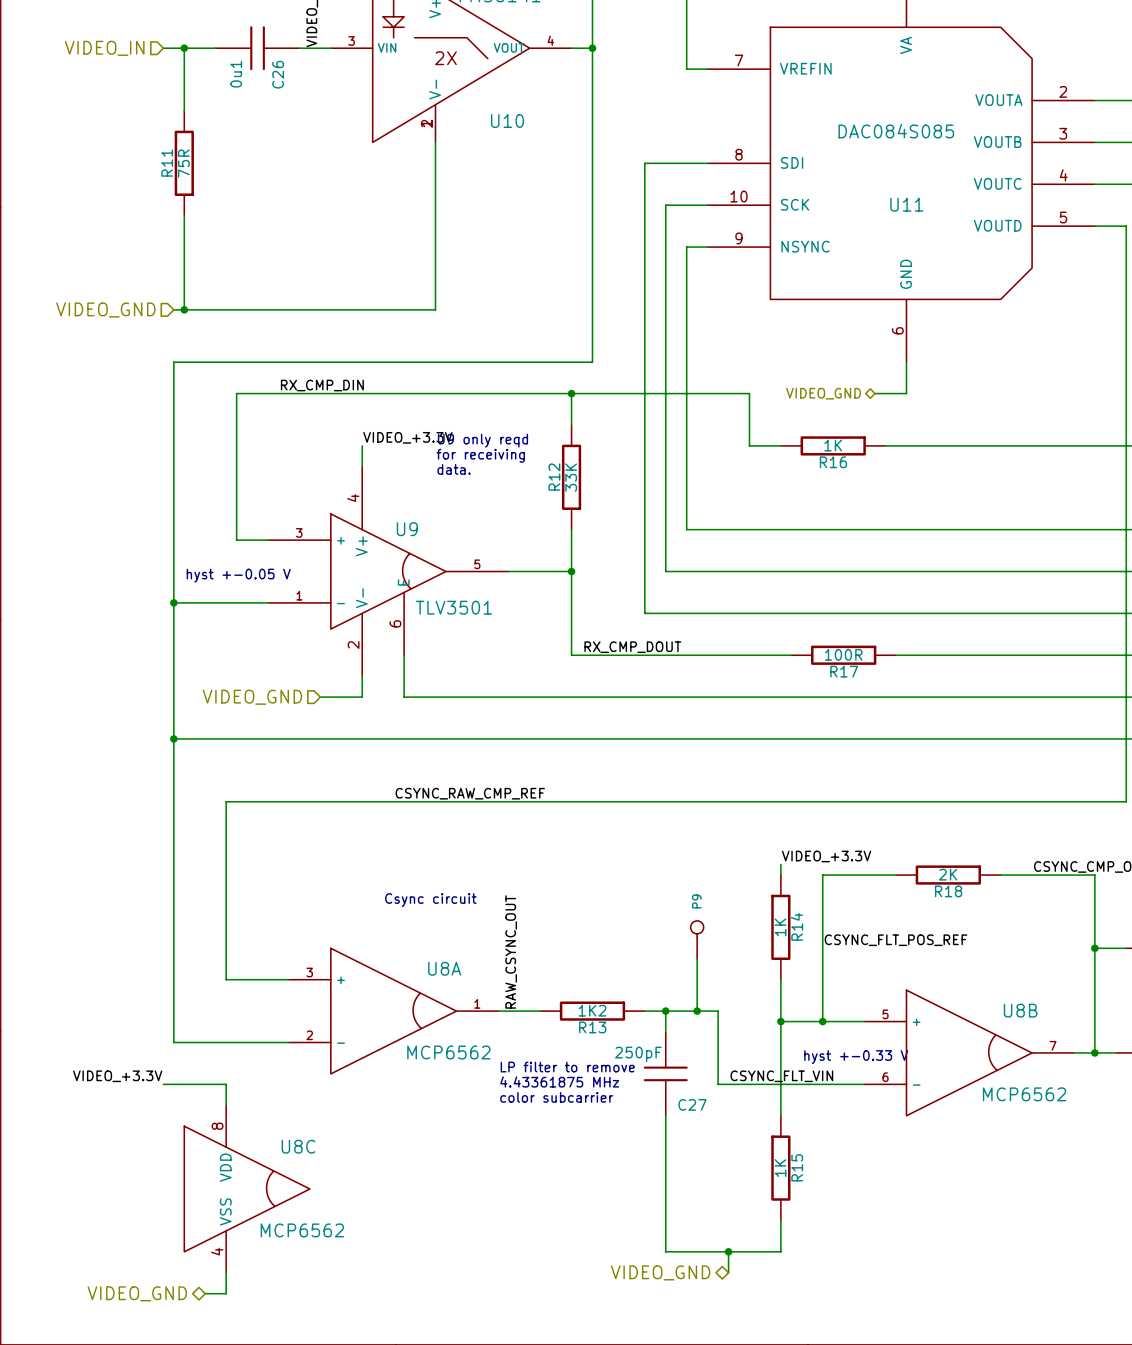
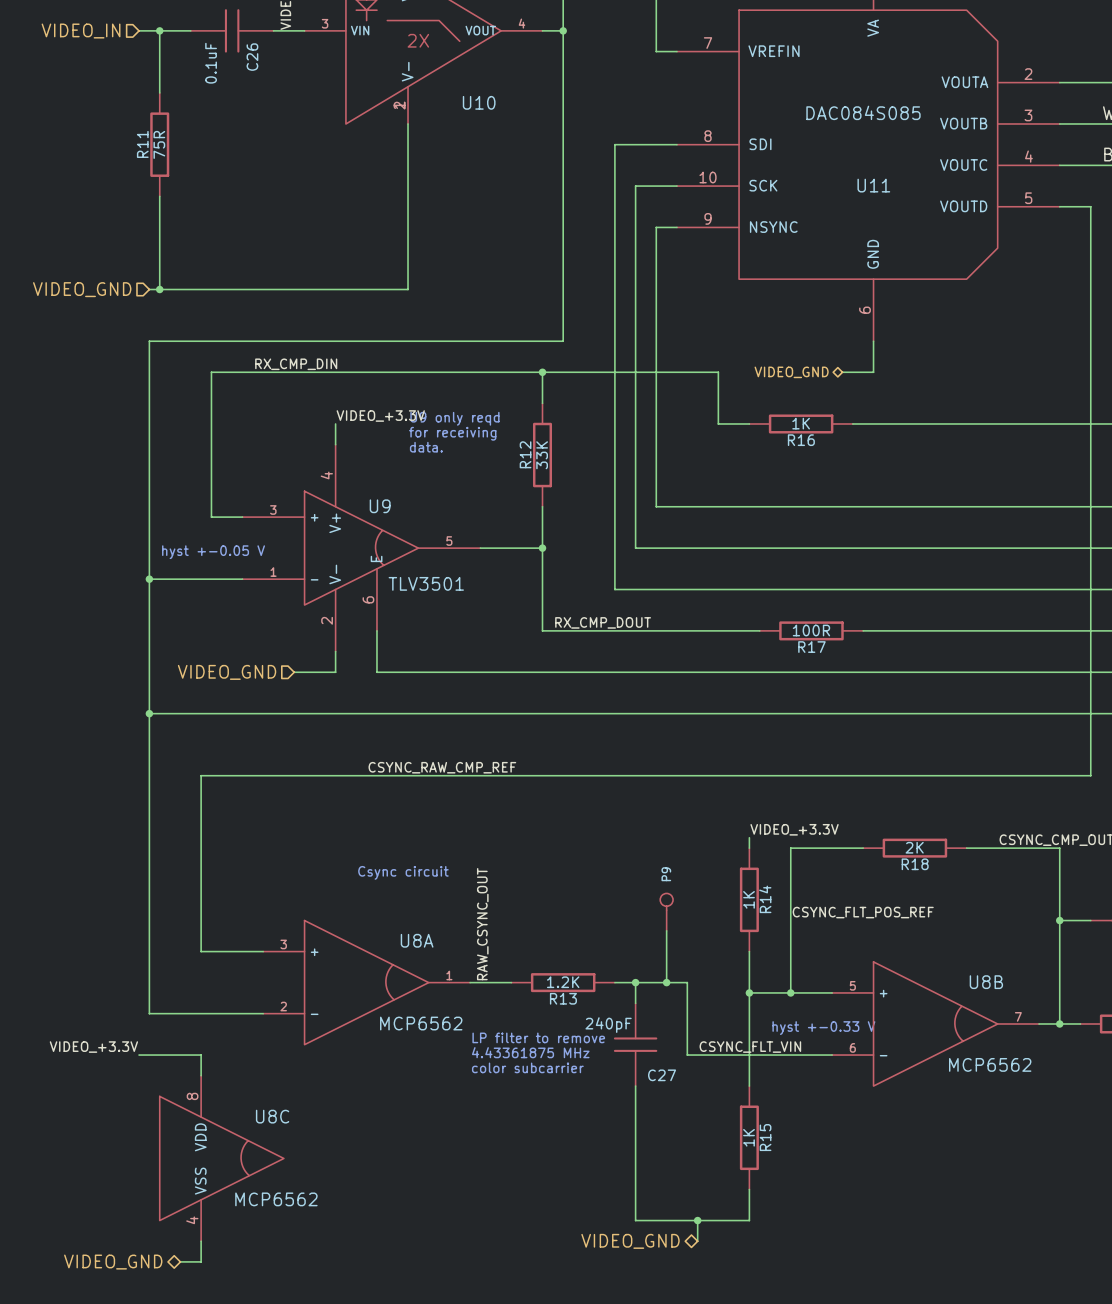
C26 value: 0u1 (236, 74) -> 0.1uF (211, 63)
R13 value: 1K2 (592, 1010) -> 1.2K (563, 982)
C27 value: 250pF (638, 1054) -> 240pF (608, 1025)

